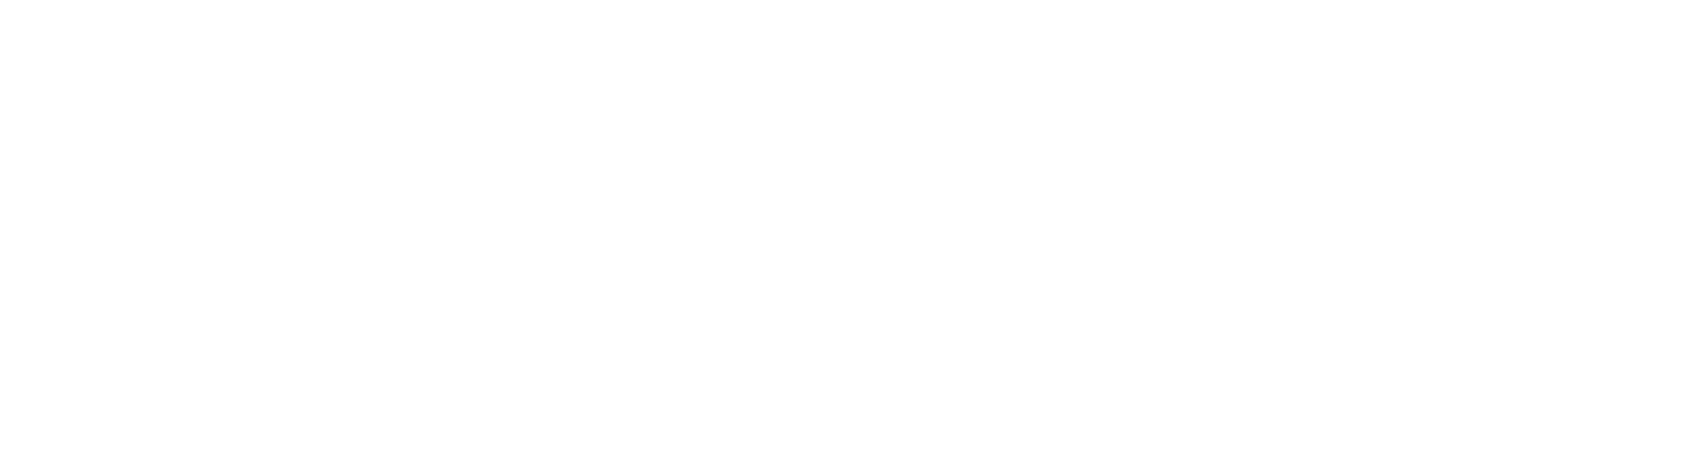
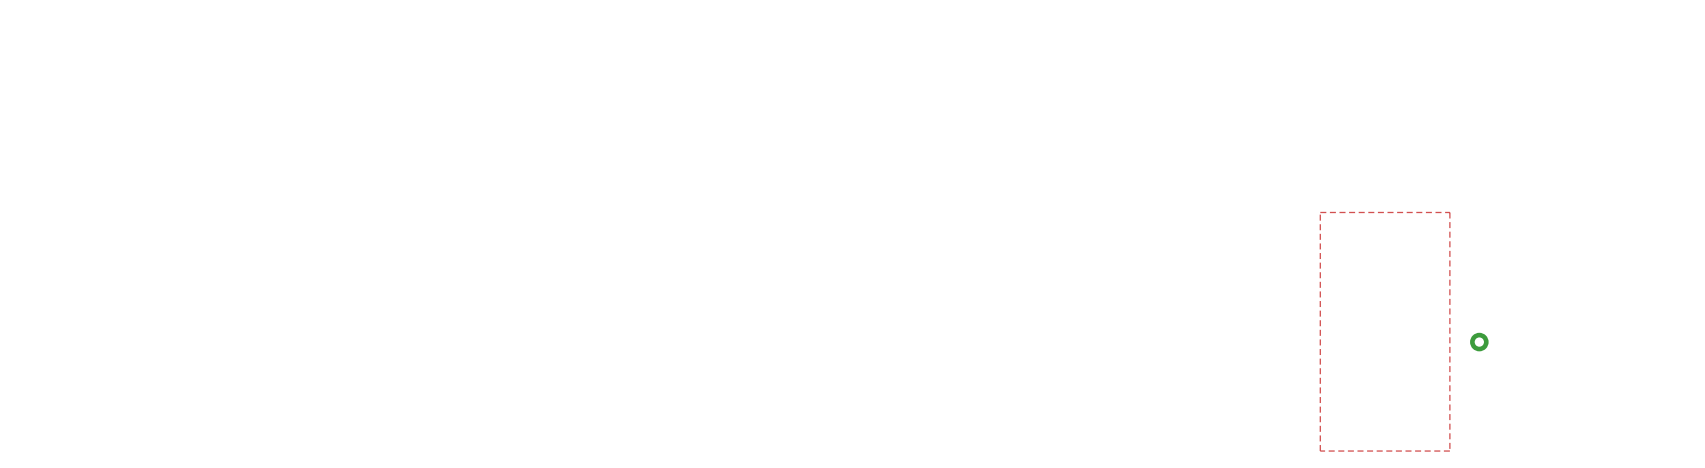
top zone outline: none -> (1320, 212) (1320, 451) (1449, 451) (1449, 212) (1320, 212)
via: none -> (1479, 342)

